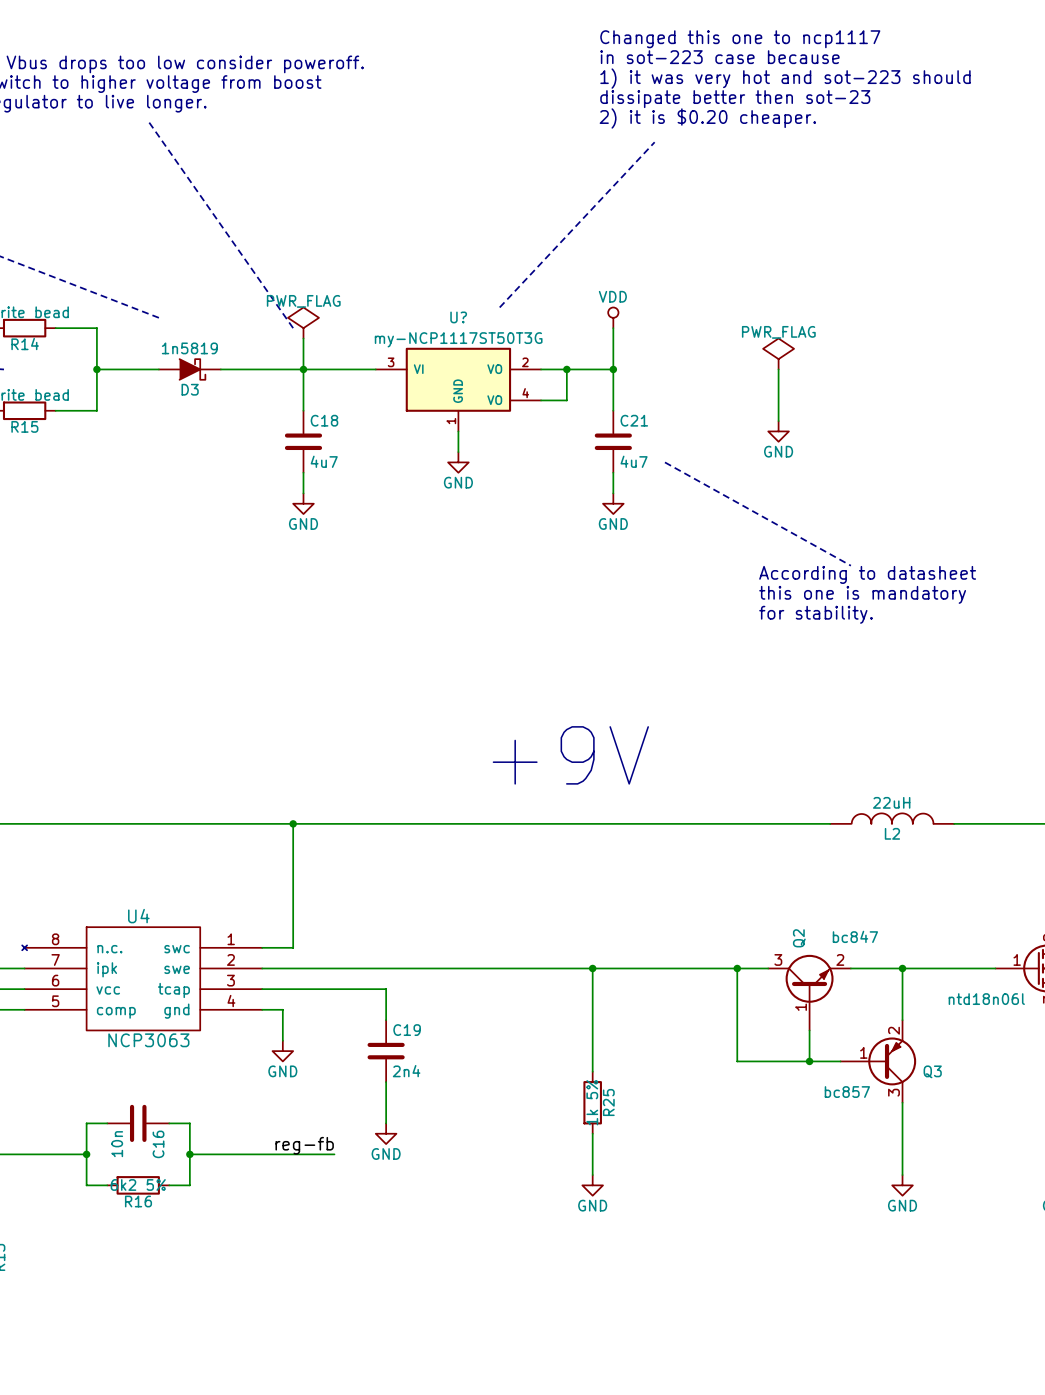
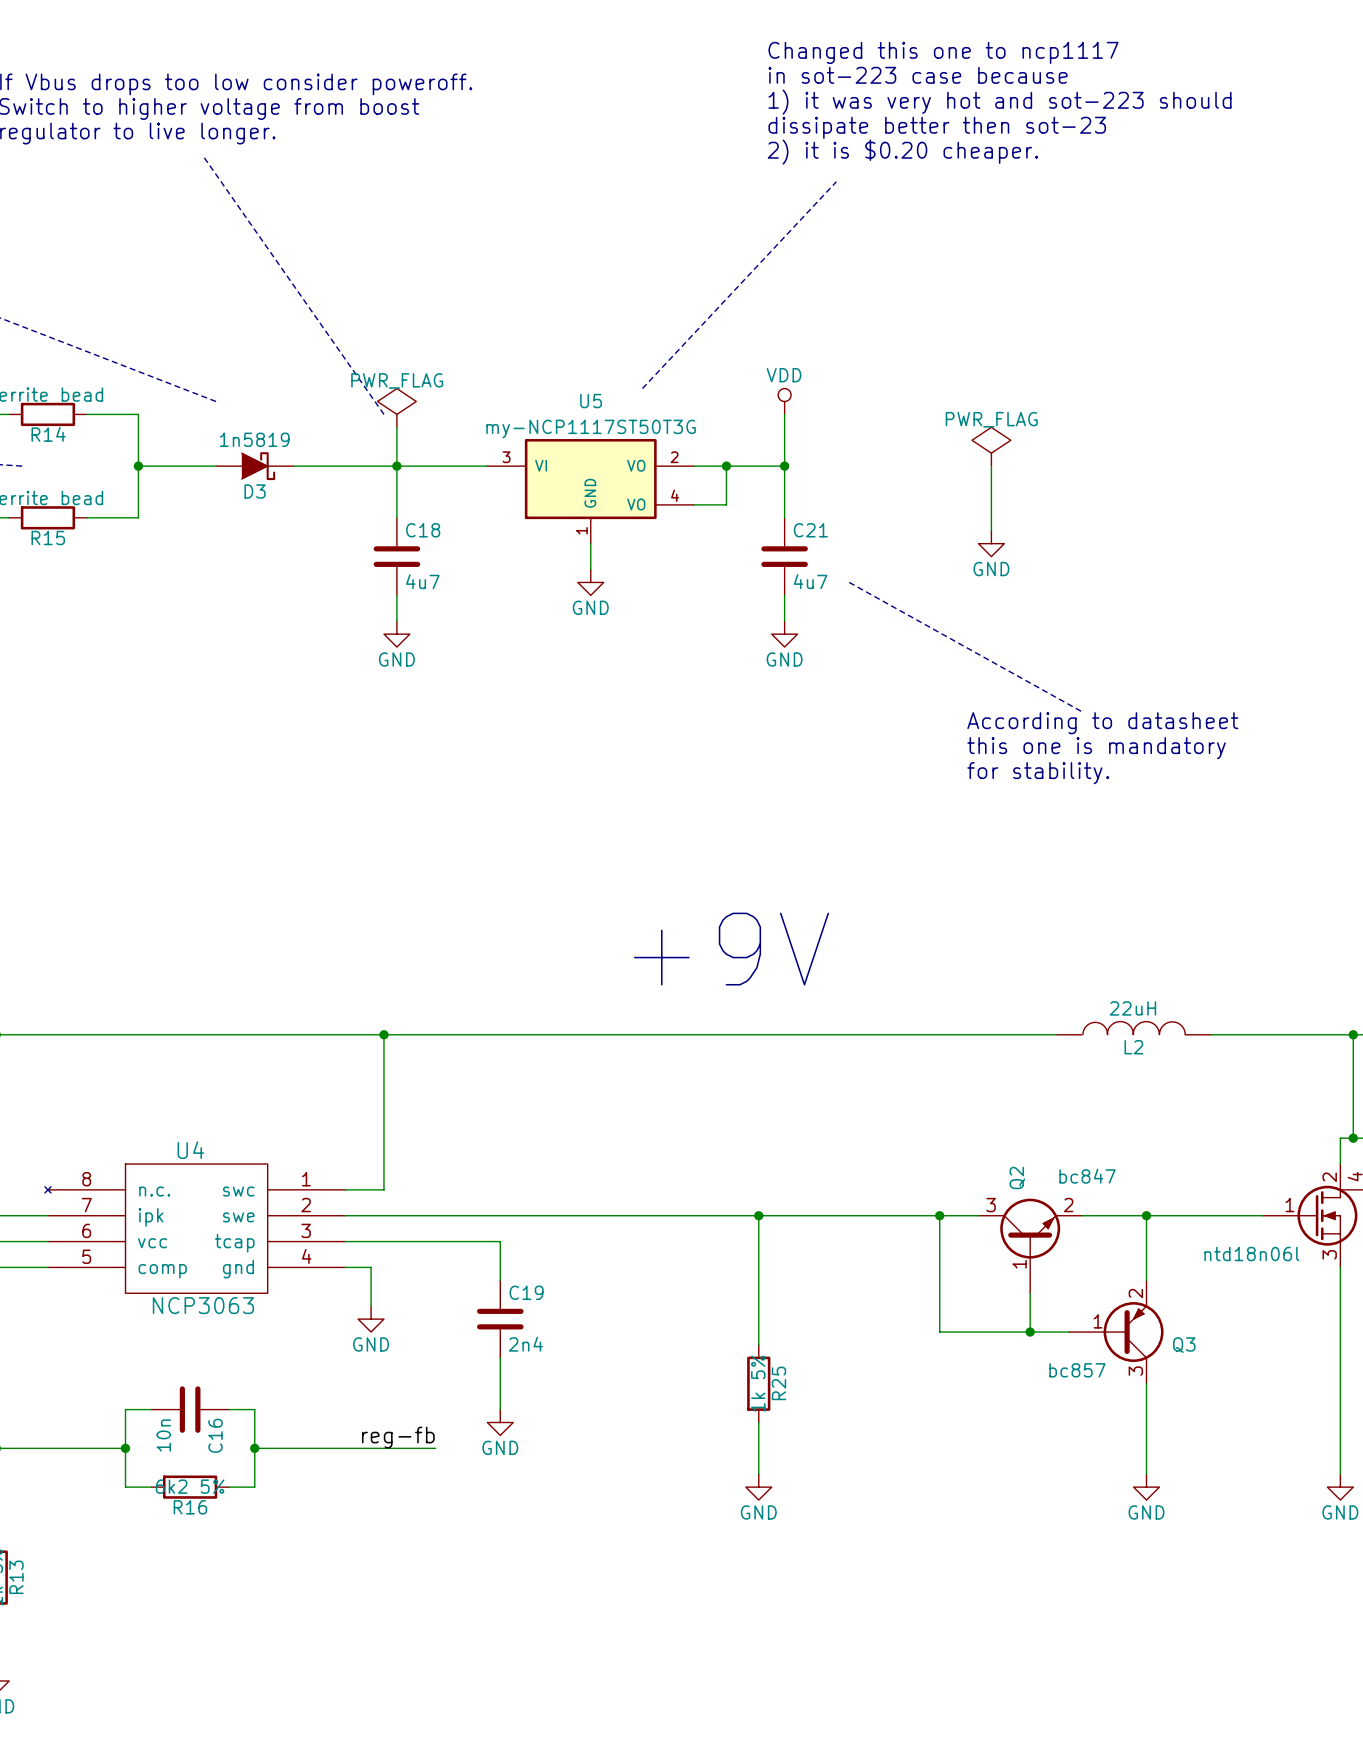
U? name: U? (458, 317) -> U5 (591, 401)

